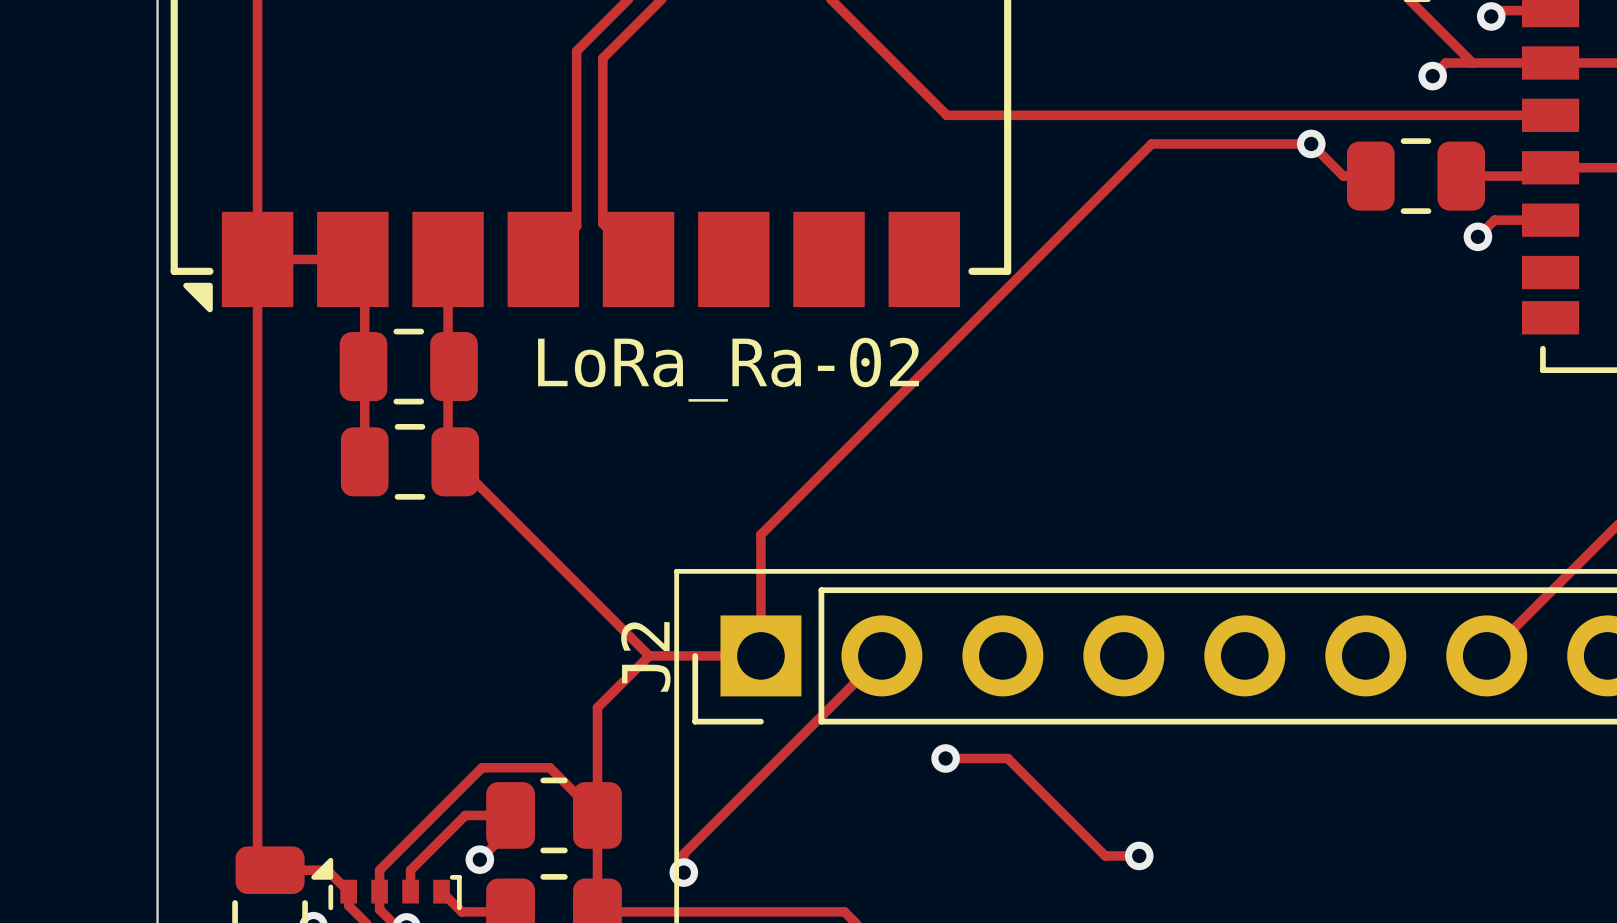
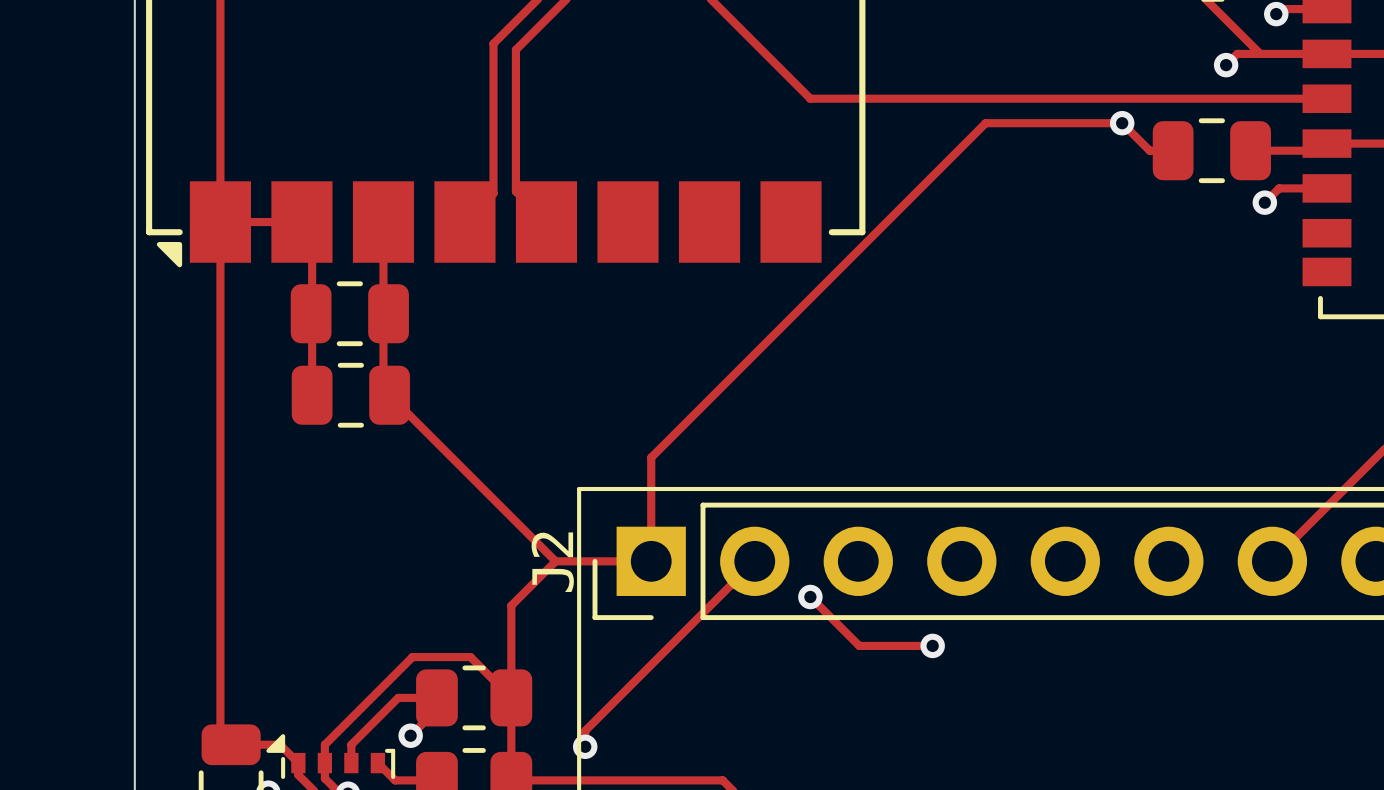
part value: LoRa_Ra-02 (728, 369) -> none
track: none -> (810, 597) (859, 645) (932, 645)
via: none -> (932, 645)
track: (945, 758) (1007, 758) (1105, 855) (1139, 855) -> none
via position: (945, 758) -> (810, 597)
via: (1139, 855) -> none

